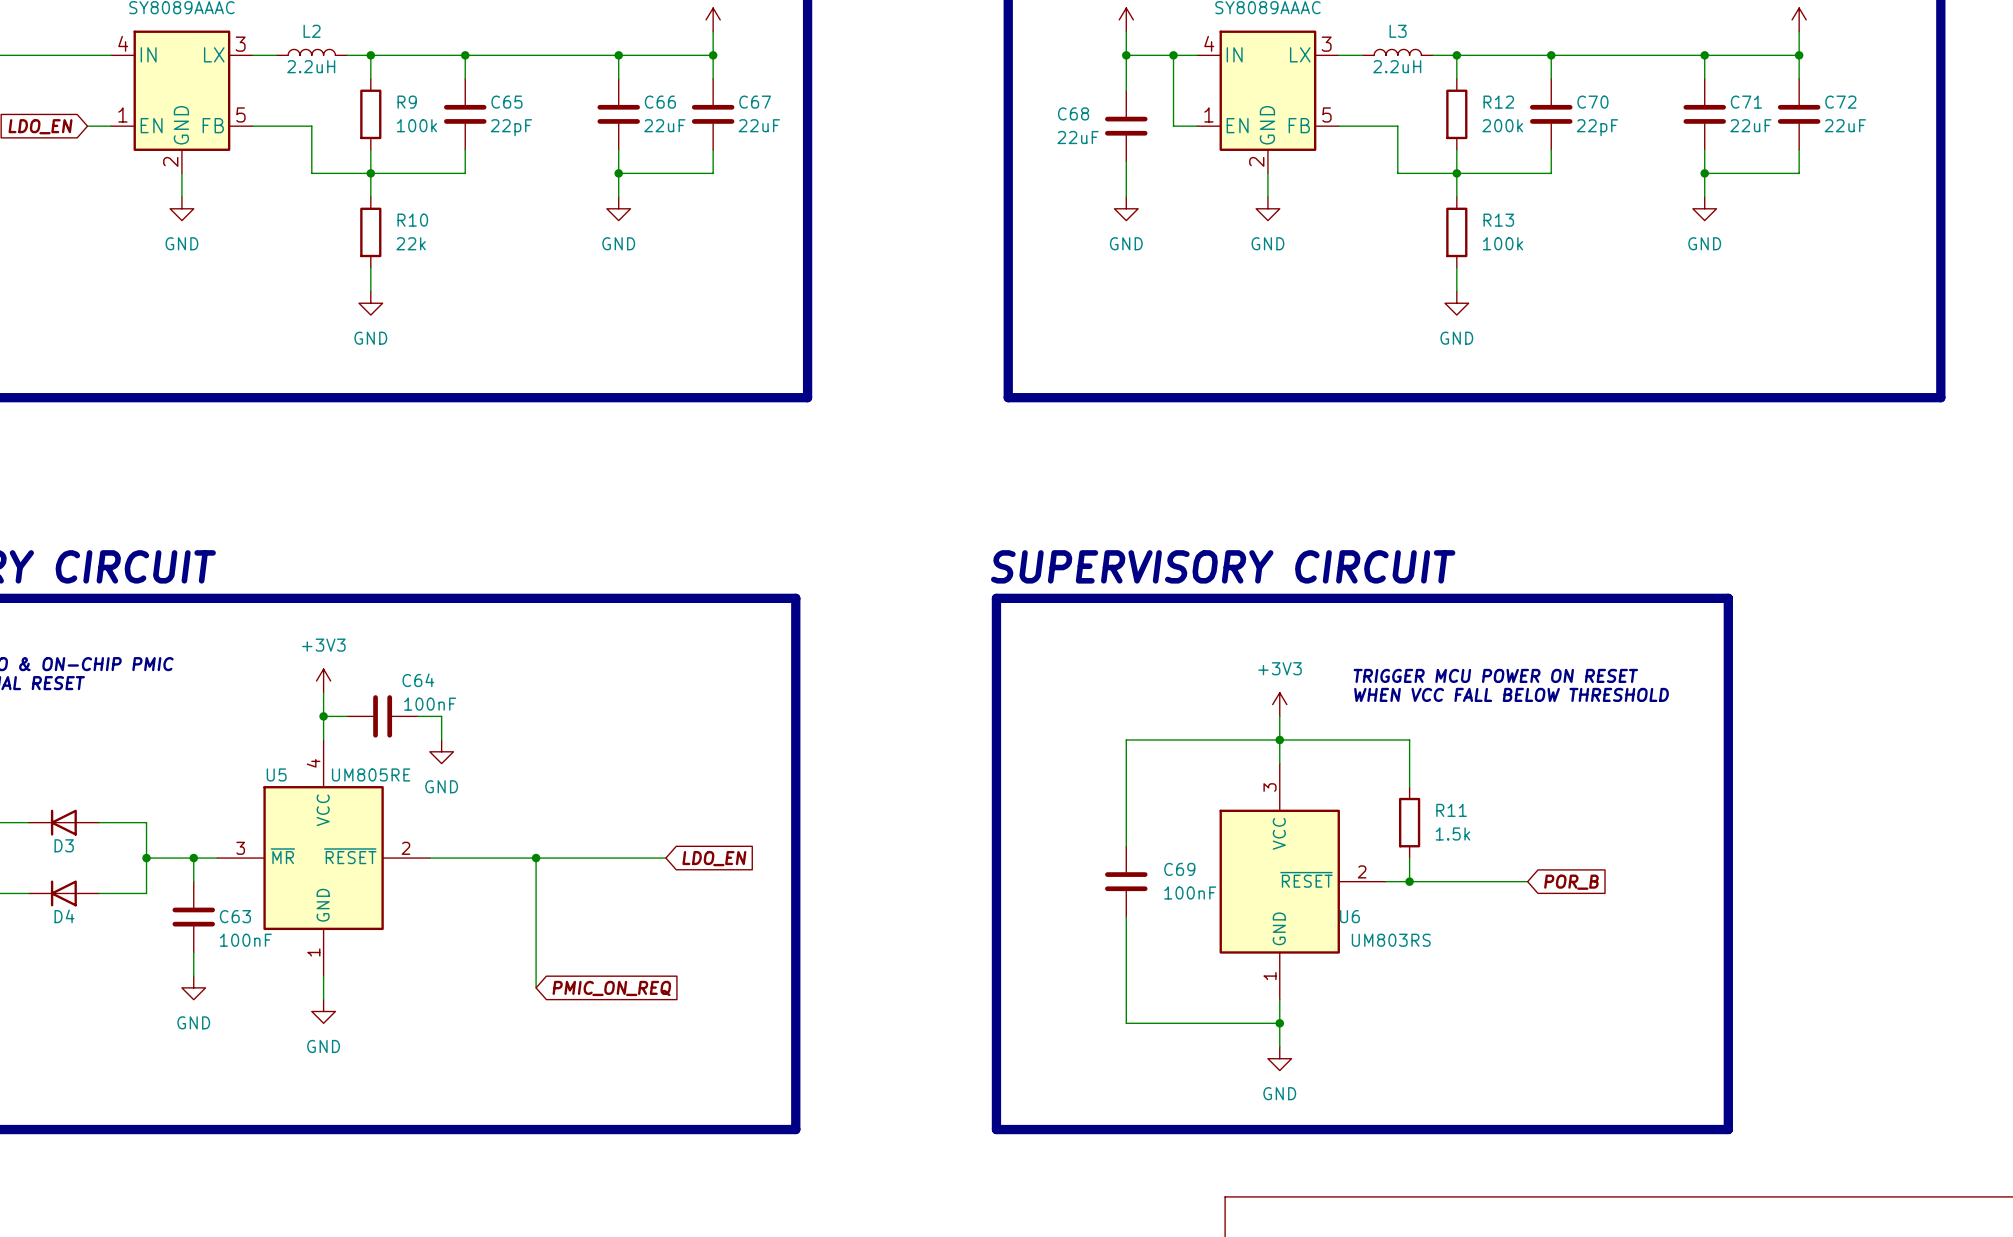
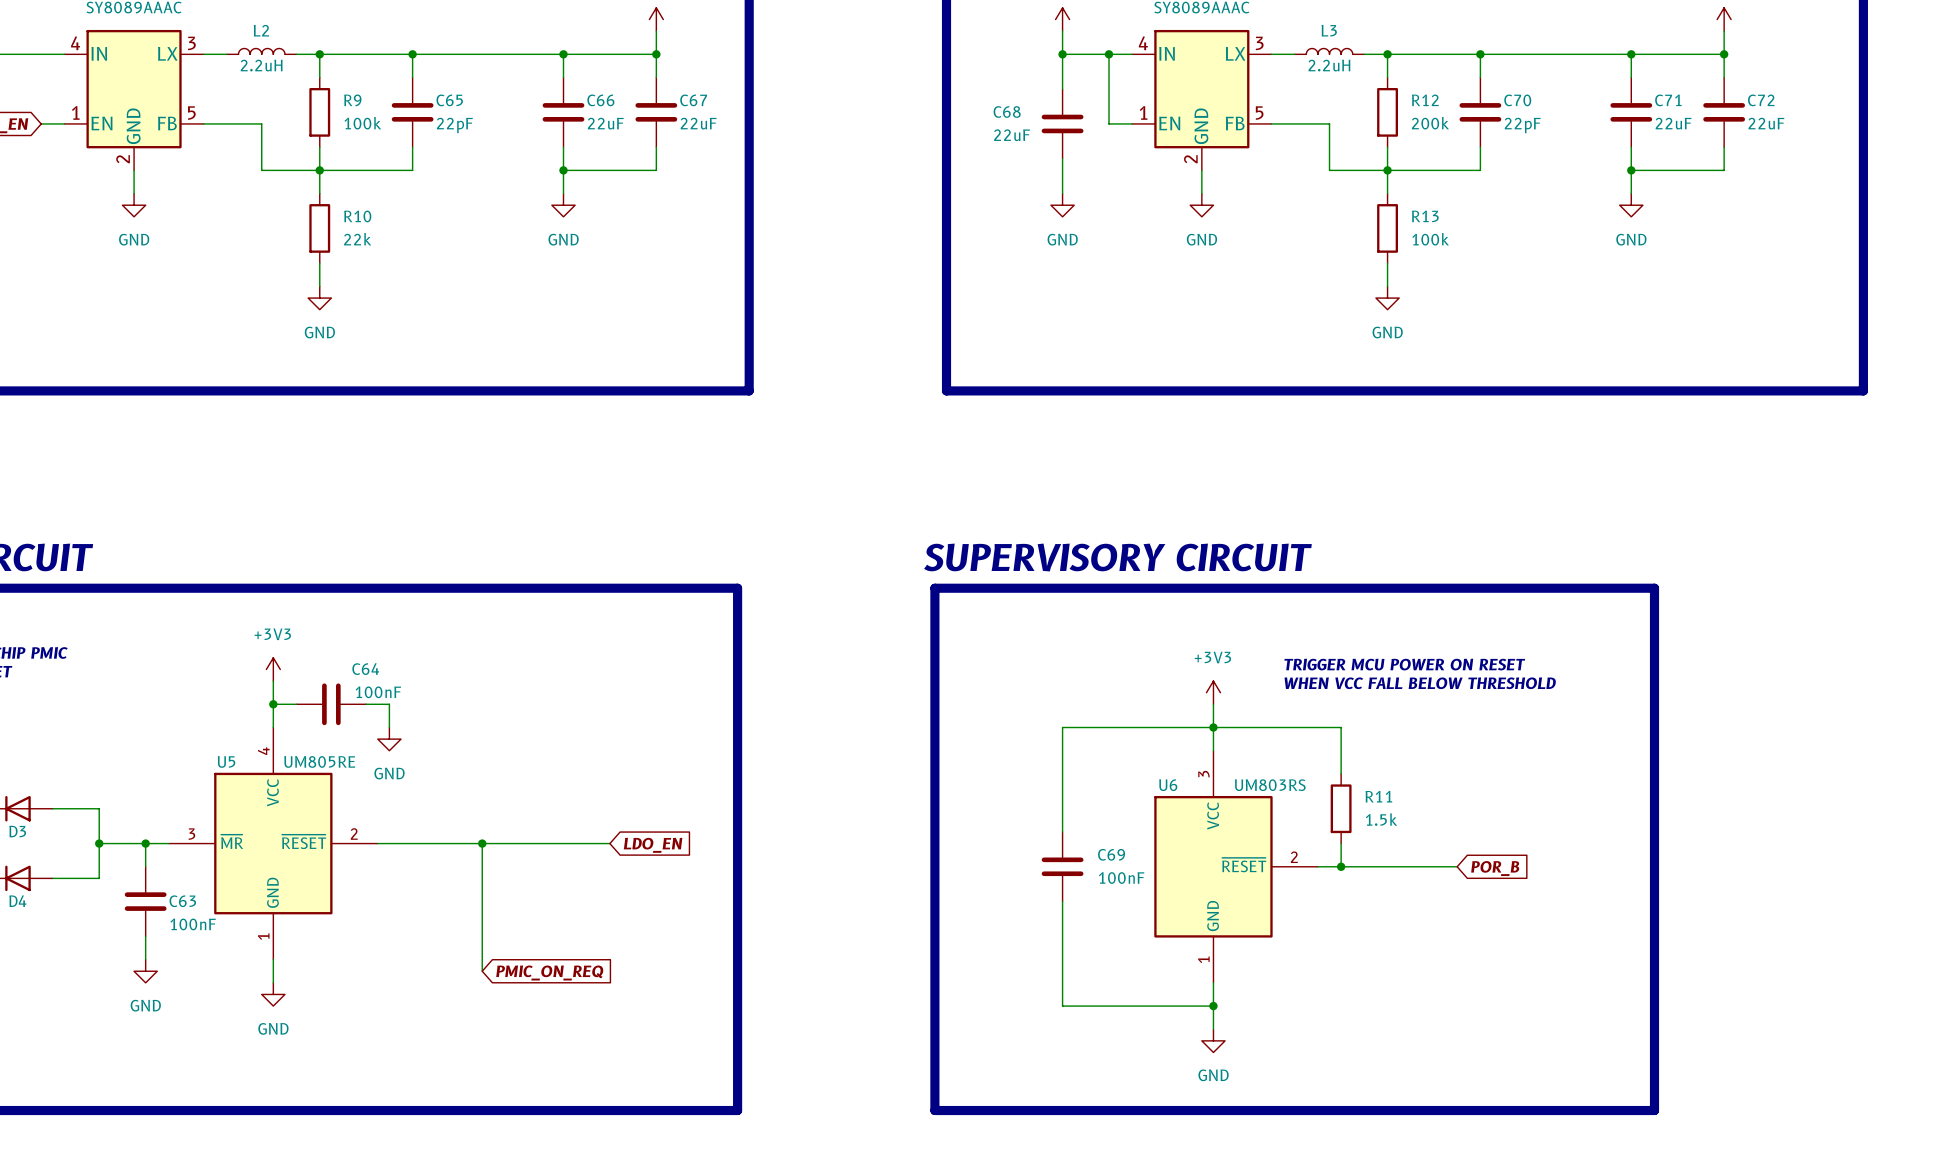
U6 name position: U6 (1349, 916) -> U6 (1168, 785)
U6 value position: UM803RS (1391, 940) -> UM803RS (1270, 785)

